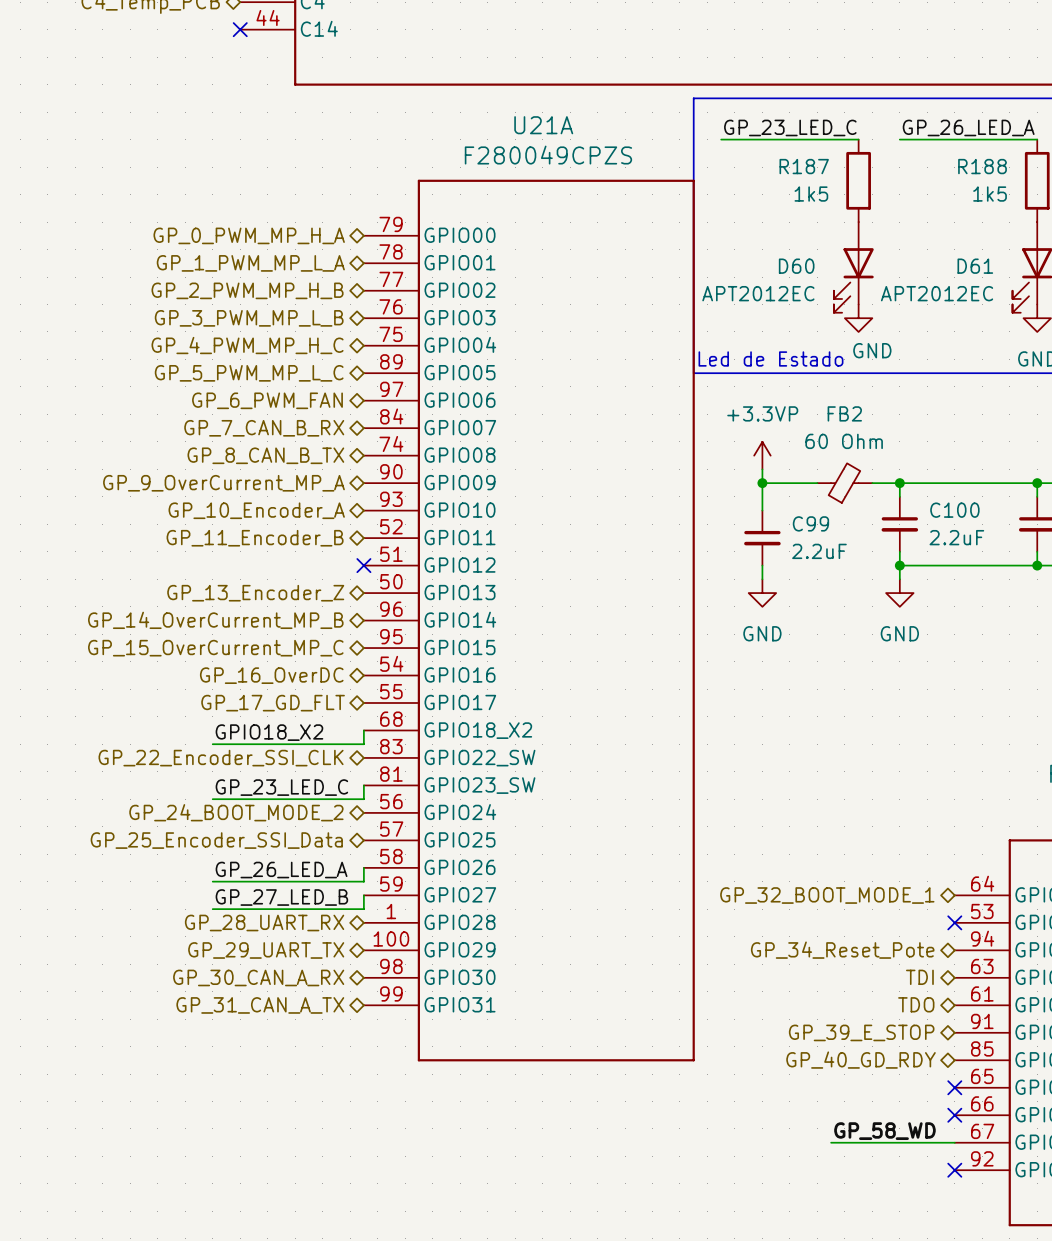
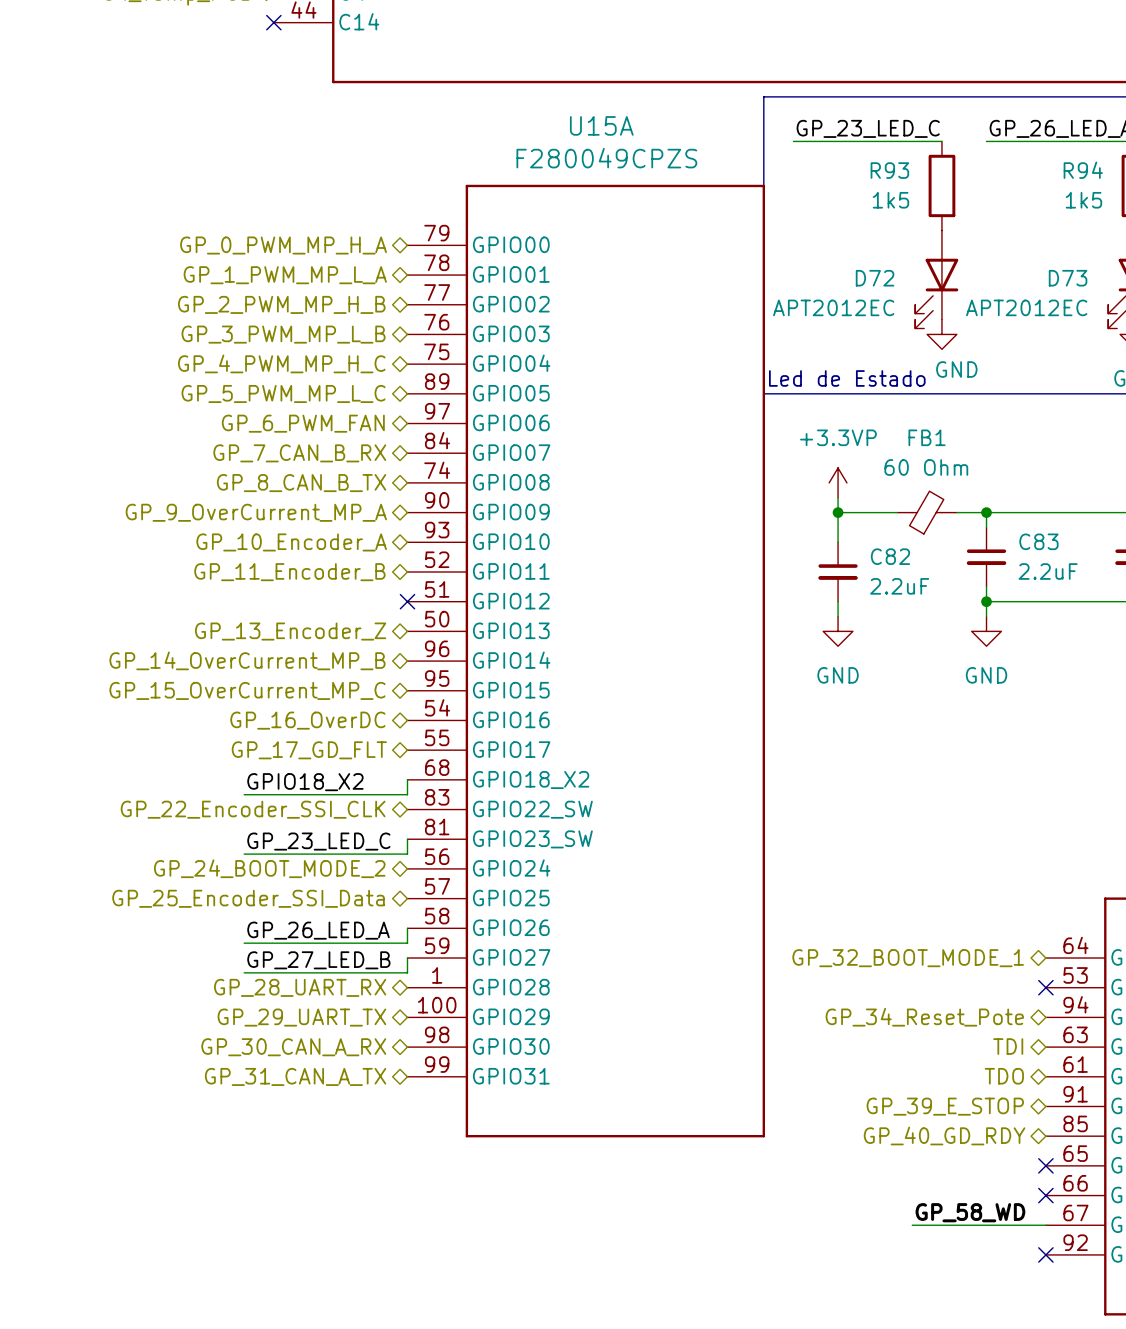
U21A name: U21A (543, 125) -> U15A (601, 125)
R187 name: R187 (804, 166) -> R93 (889, 170)
R188 name: R188 (982, 166) -> R94 (1083, 170)
D60 name: D60 (796, 266) -> D72 (875, 278)
D61 name: D61 (975, 266) -> D73 (1068, 278)
FB2 name: FB2 (844, 413) -> FB1 (927, 437)
C100 name: C100 (954, 510) -> C83 (1038, 541)
C99 name: C99 (810, 523) -> C82 (890, 556)

